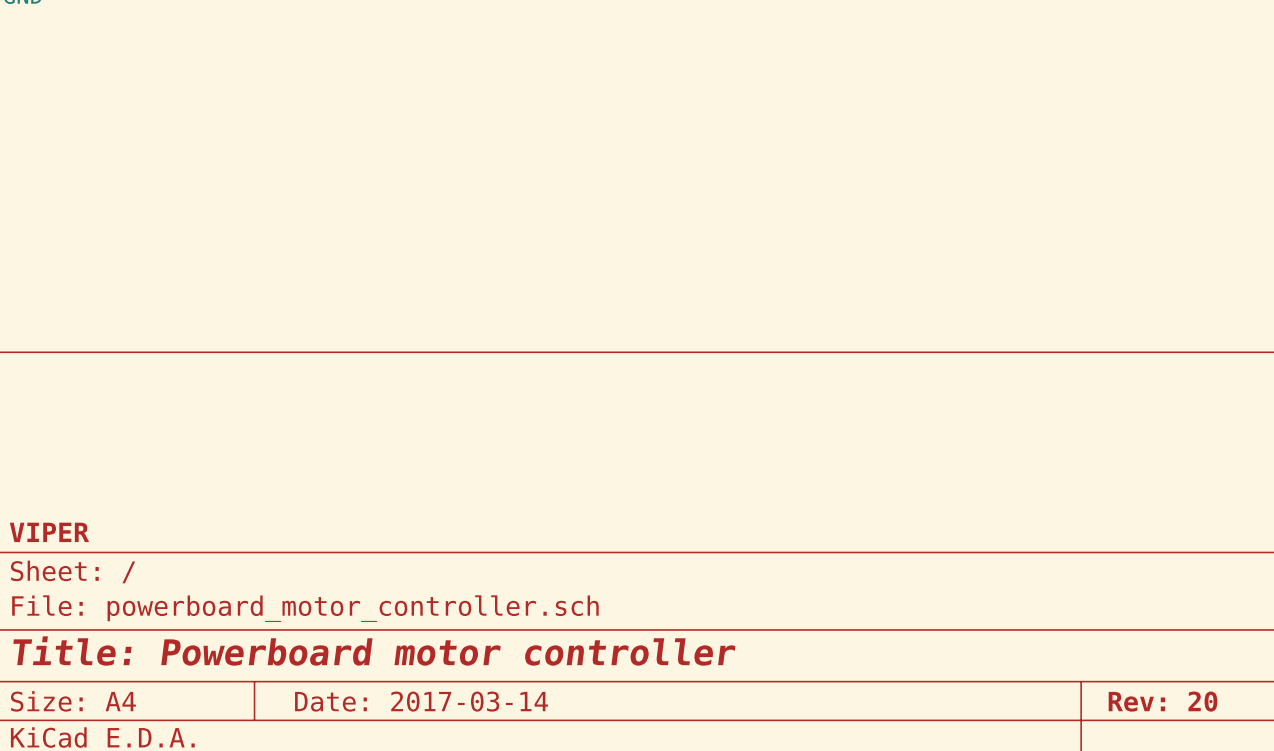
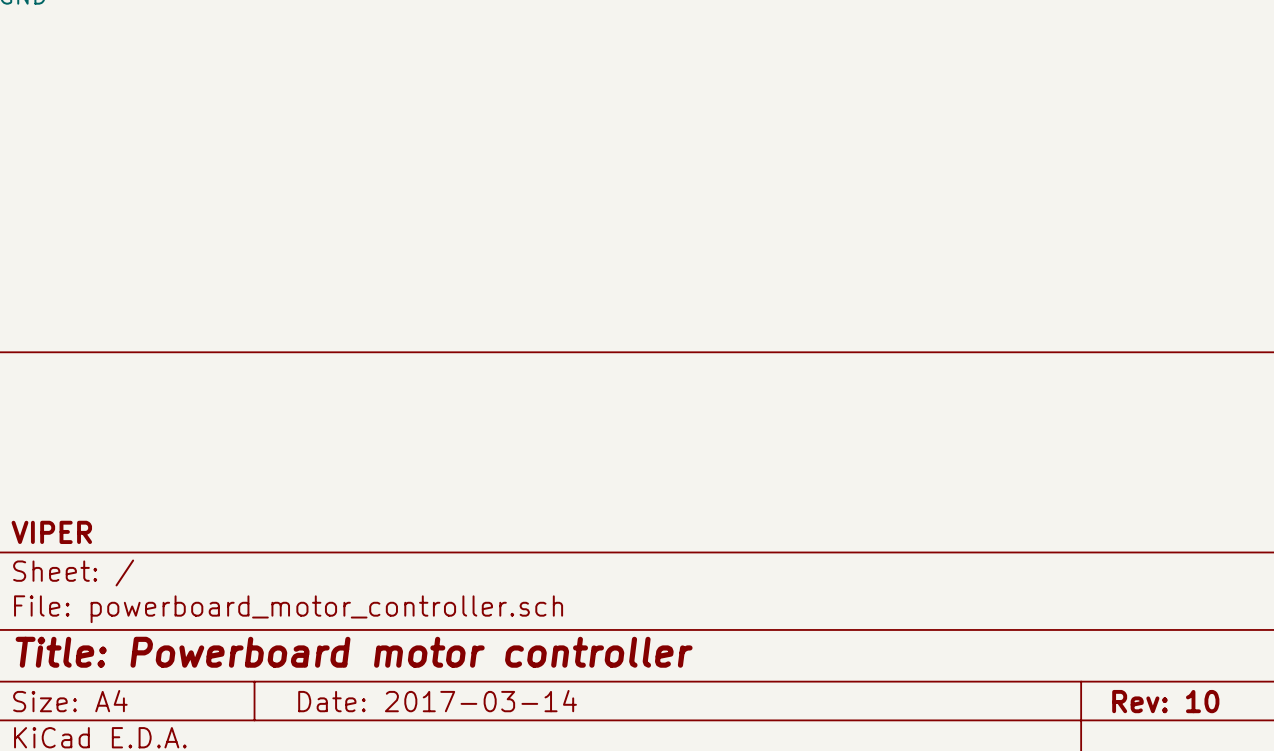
title block: Rev: 20 (1163, 701) -> Rev: 10 (1165, 701)

